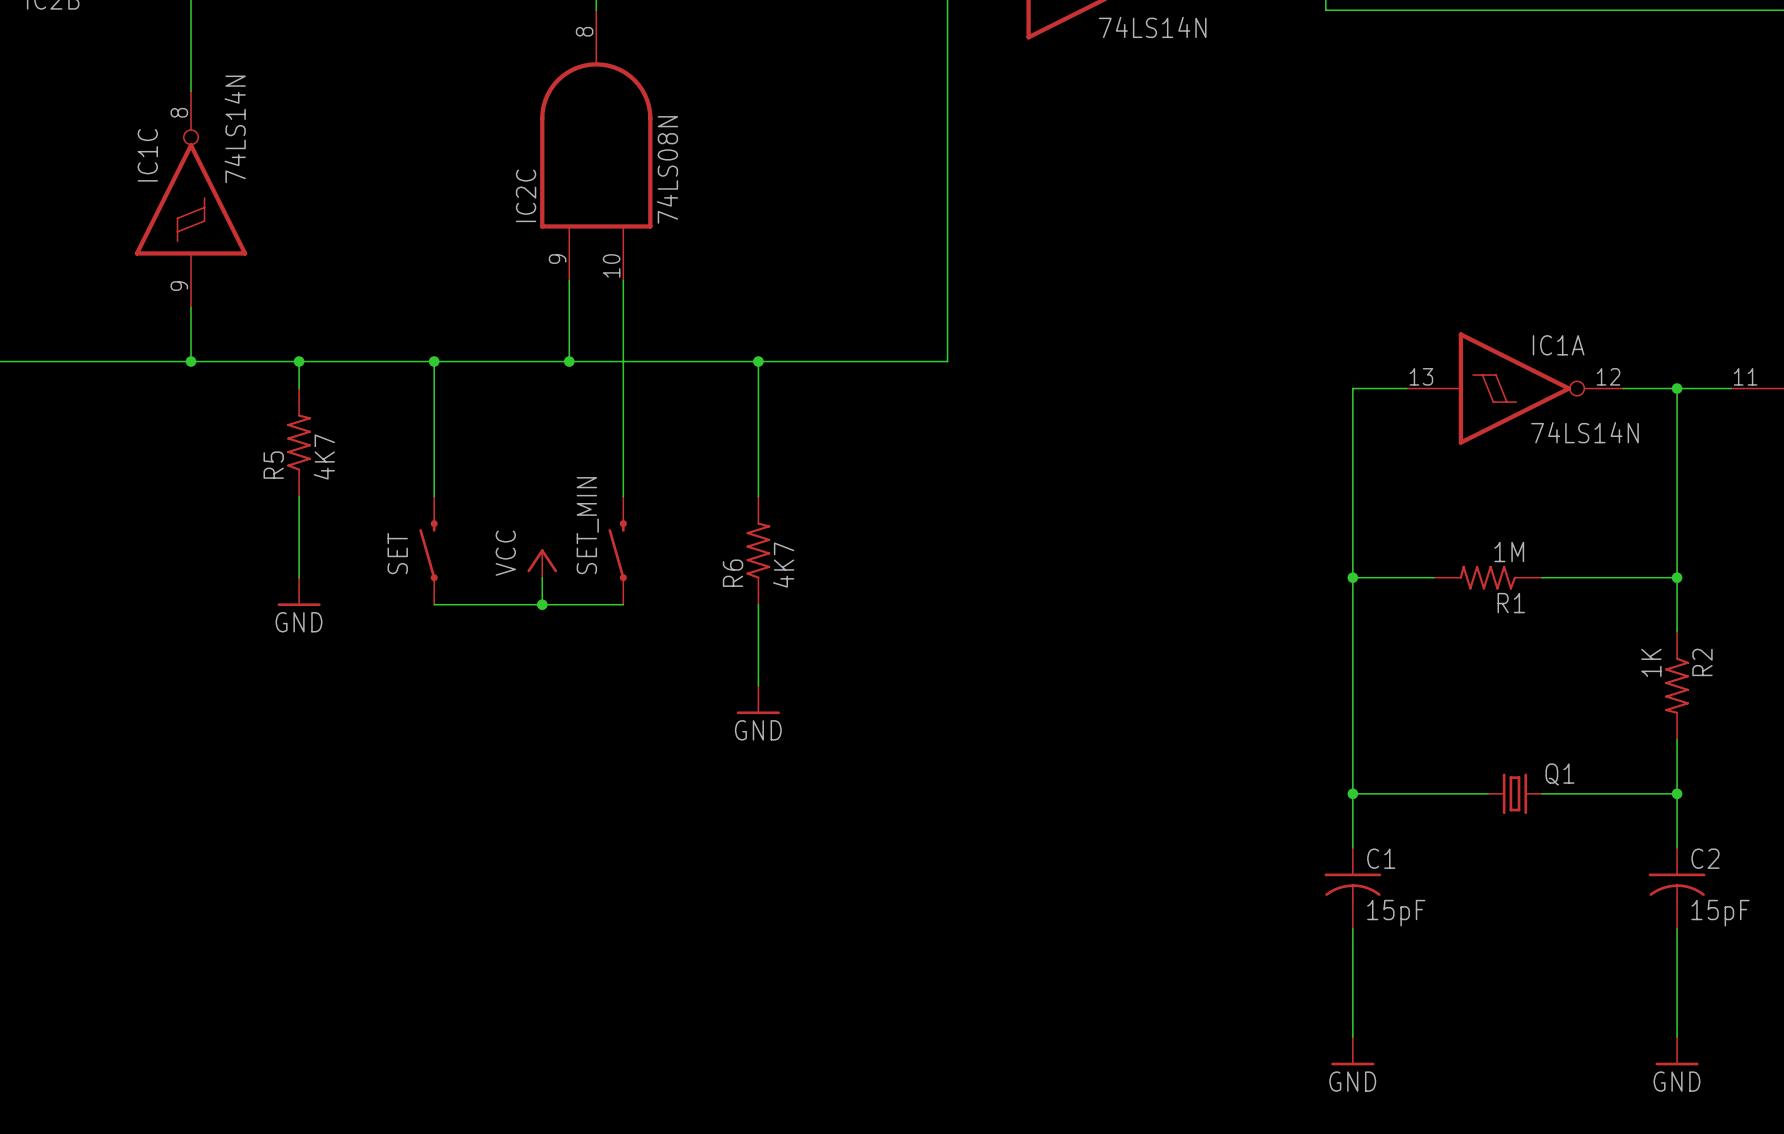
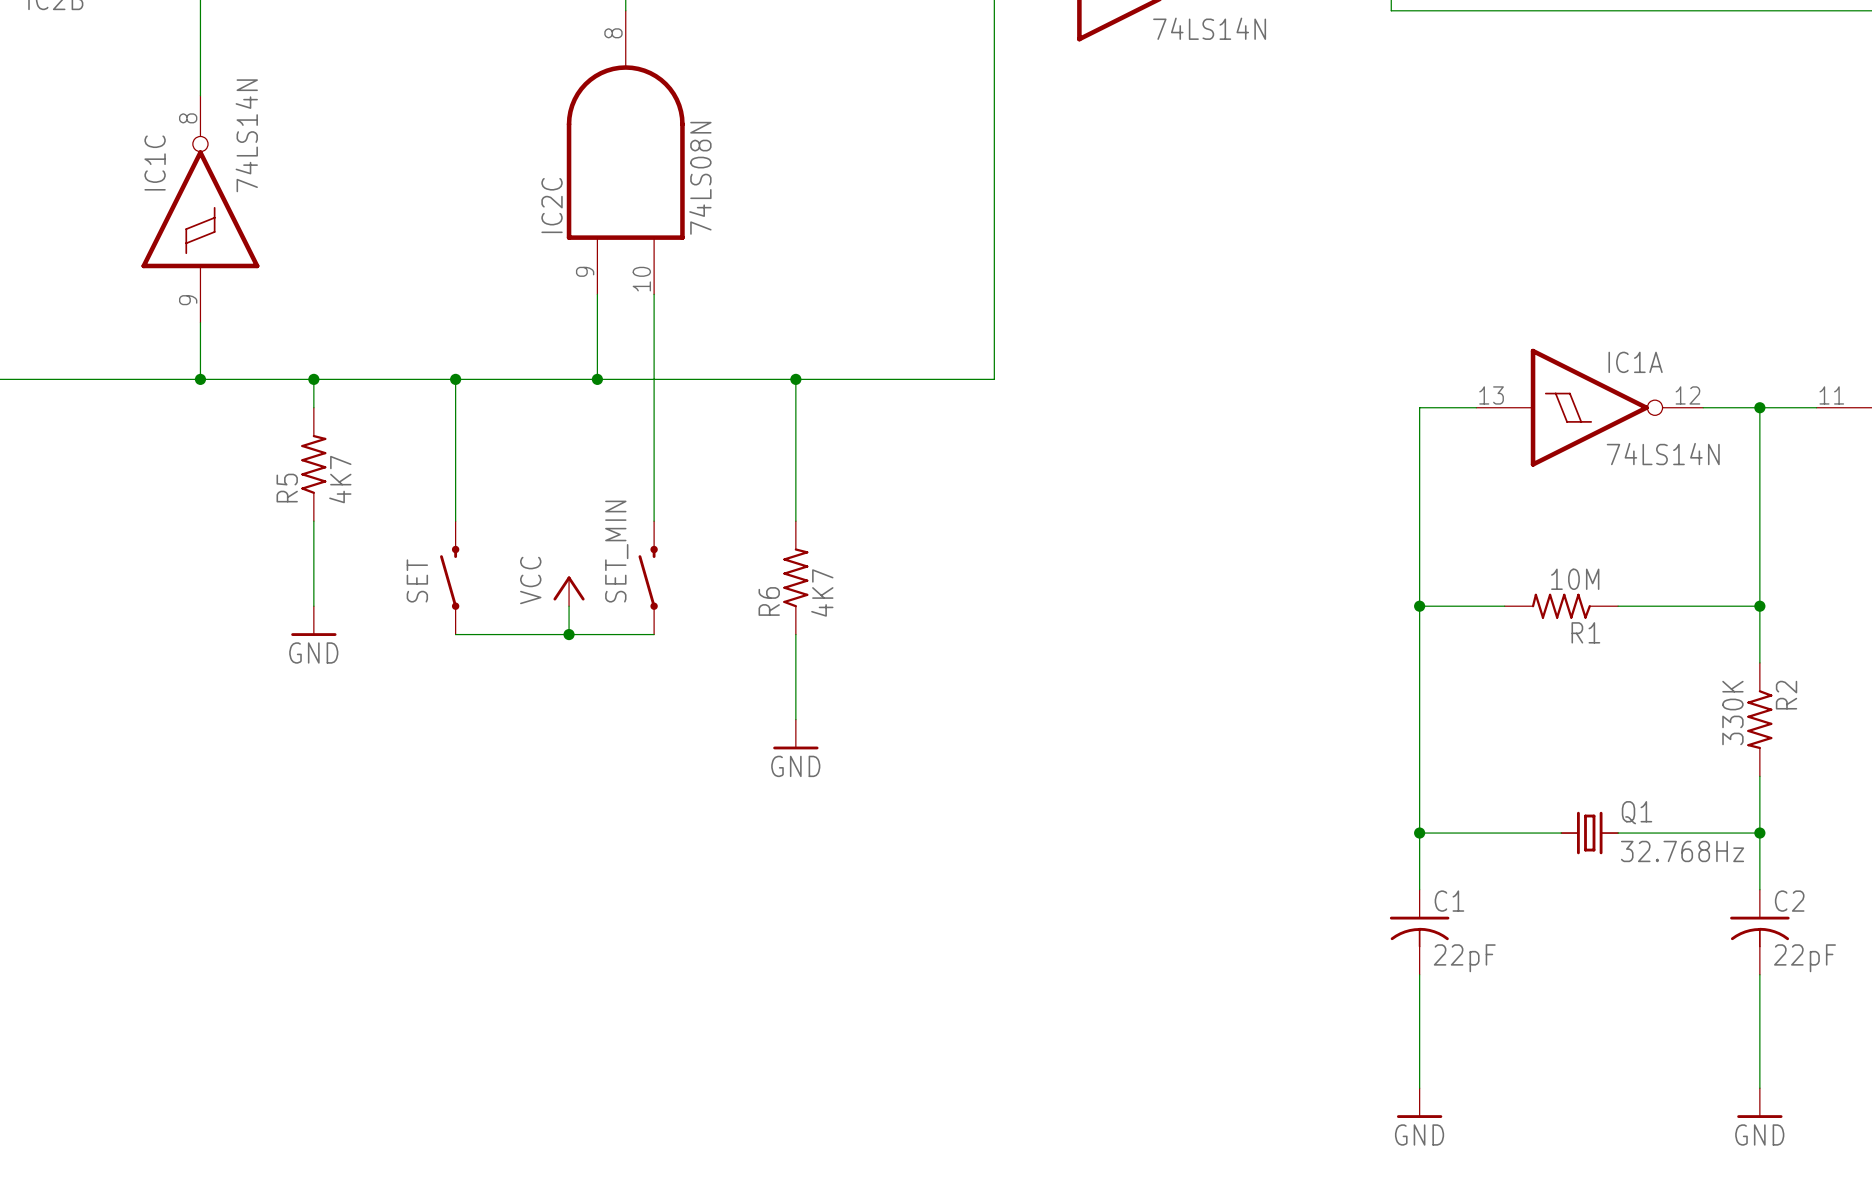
R1 value: 1M (1509, 552) -> 10M (1575, 579)
R2 value: 1K (1651, 662) -> 330K (1732, 713)
Q1 value: none -> 32.768Hz (1682, 851)
C1 value: 15pF (1396, 913) -> 22pF (1464, 958)
C2 value: 15pF (1720, 913) -> 22pF (1805, 958)

